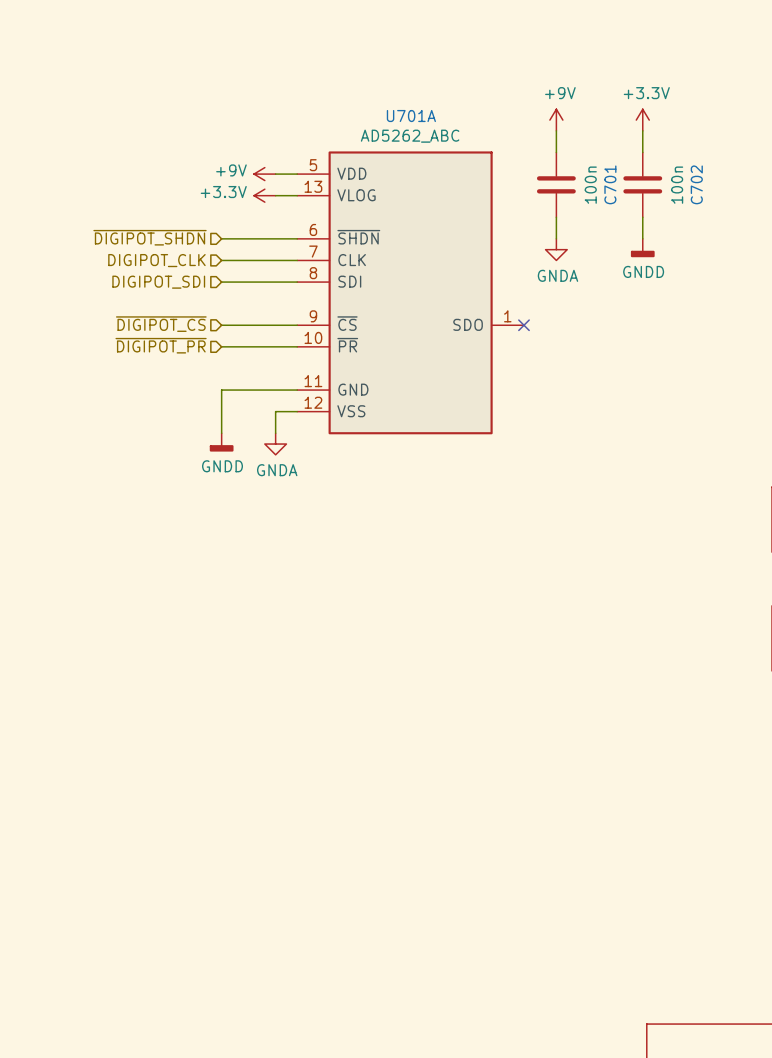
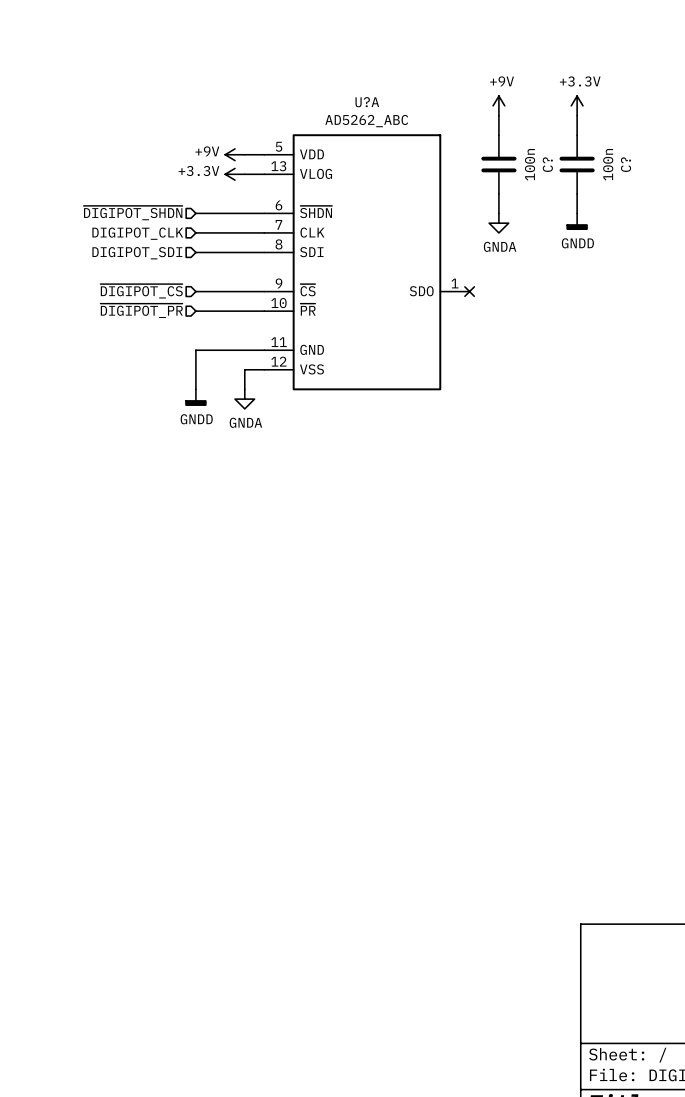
U701A name: U701A (411, 116) -> U?A (367, 102)
C701 name: C701 (610, 184) -> C? (547, 164)
C702 name: C702 (696, 184) -> C? (626, 164)

